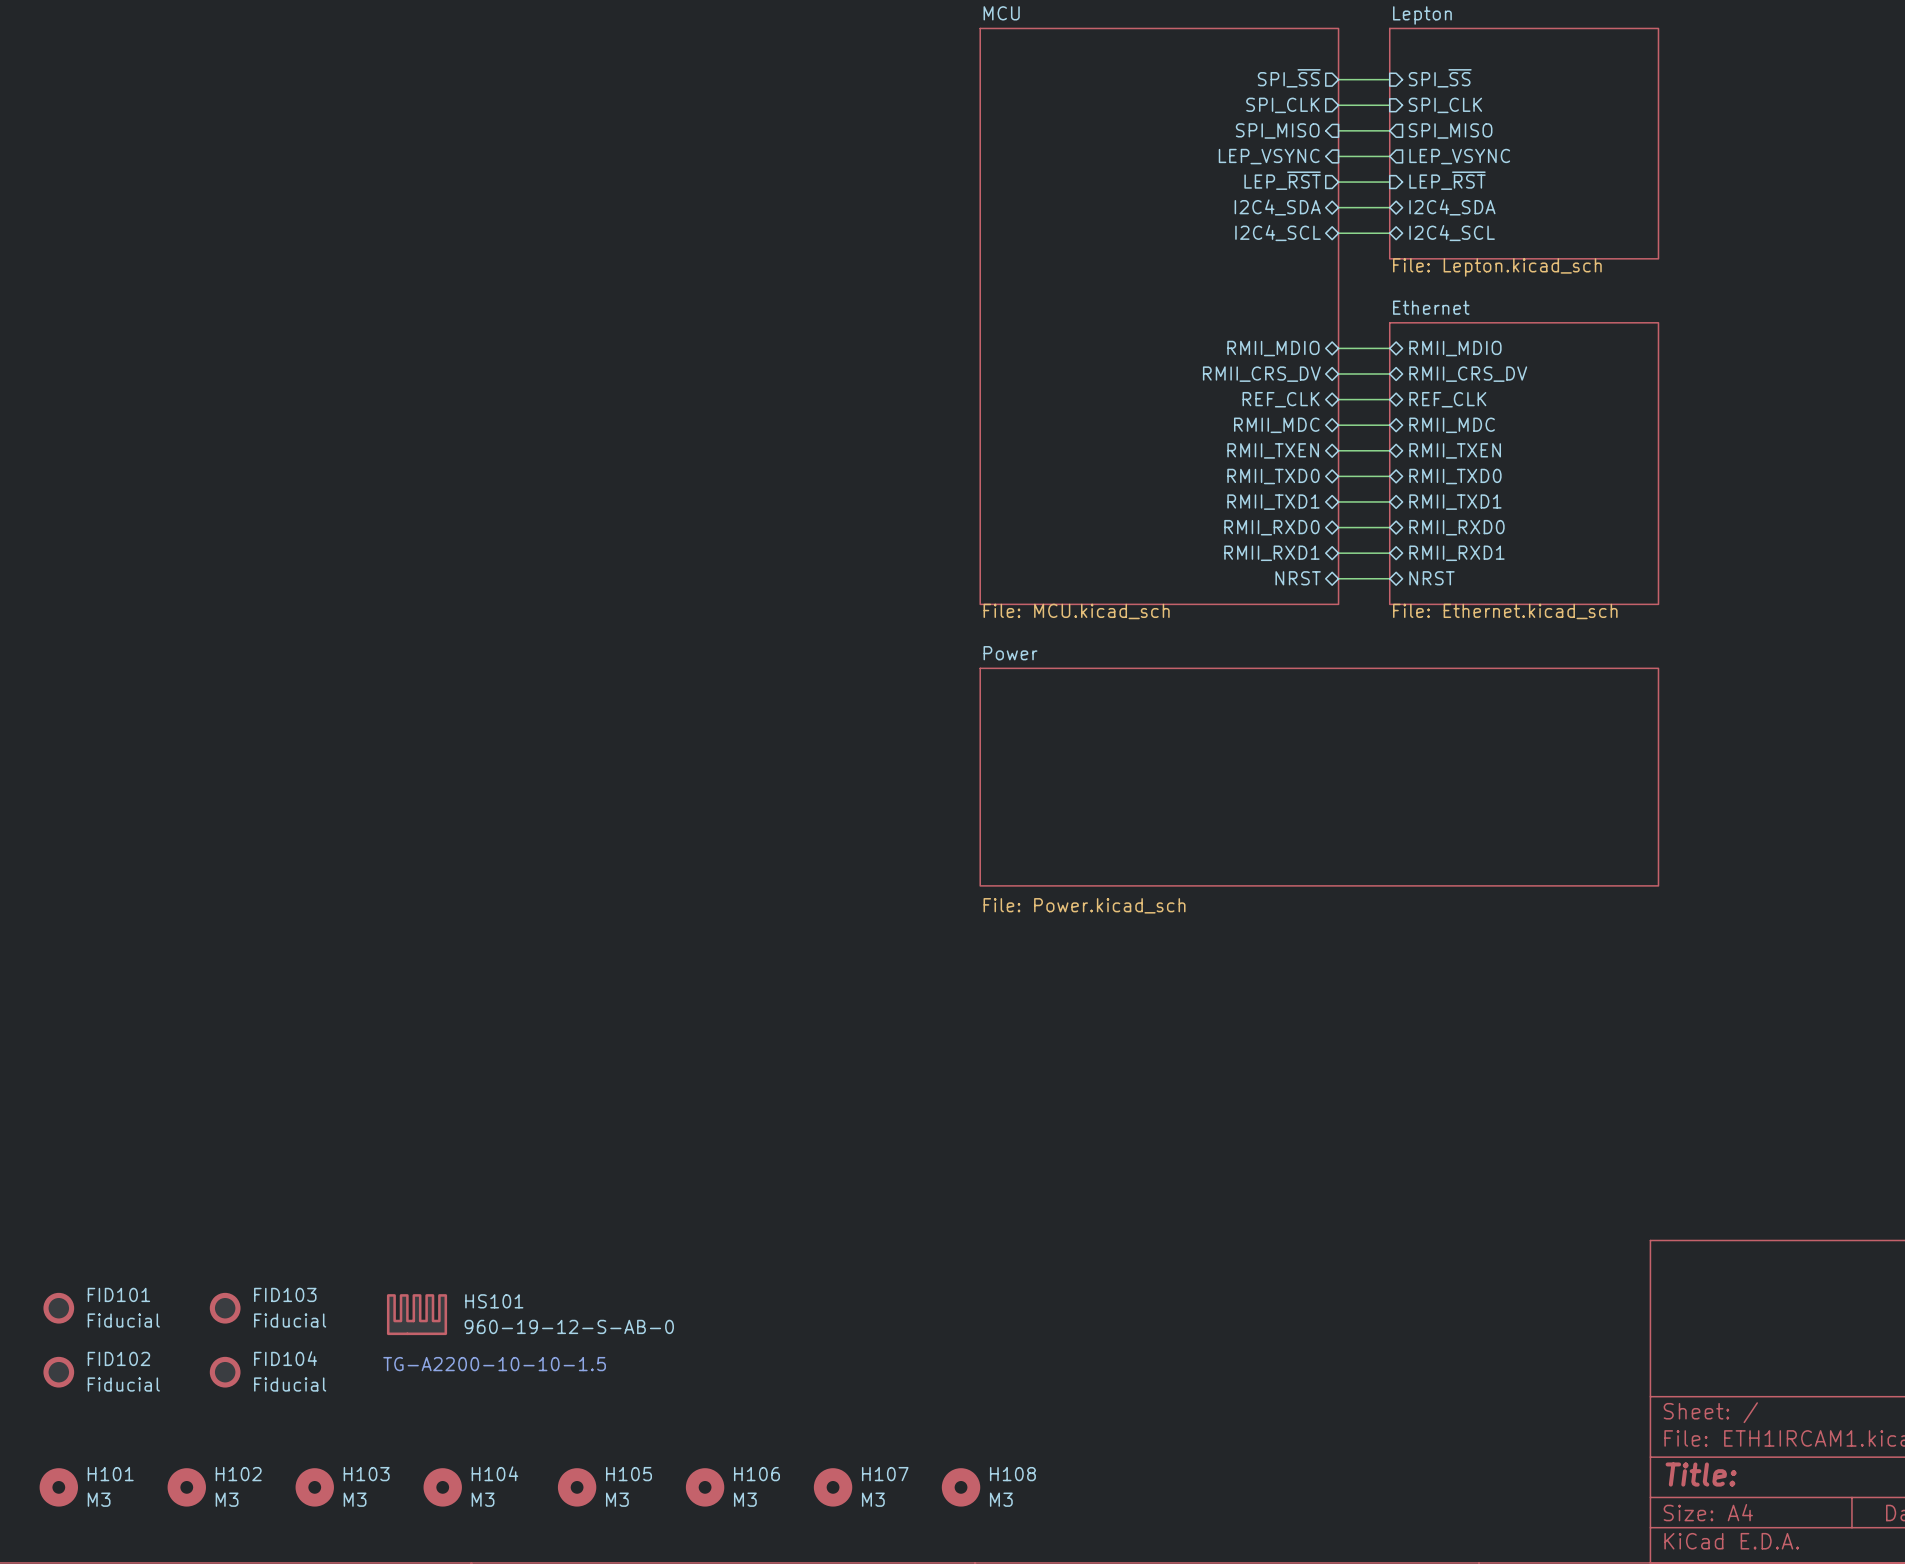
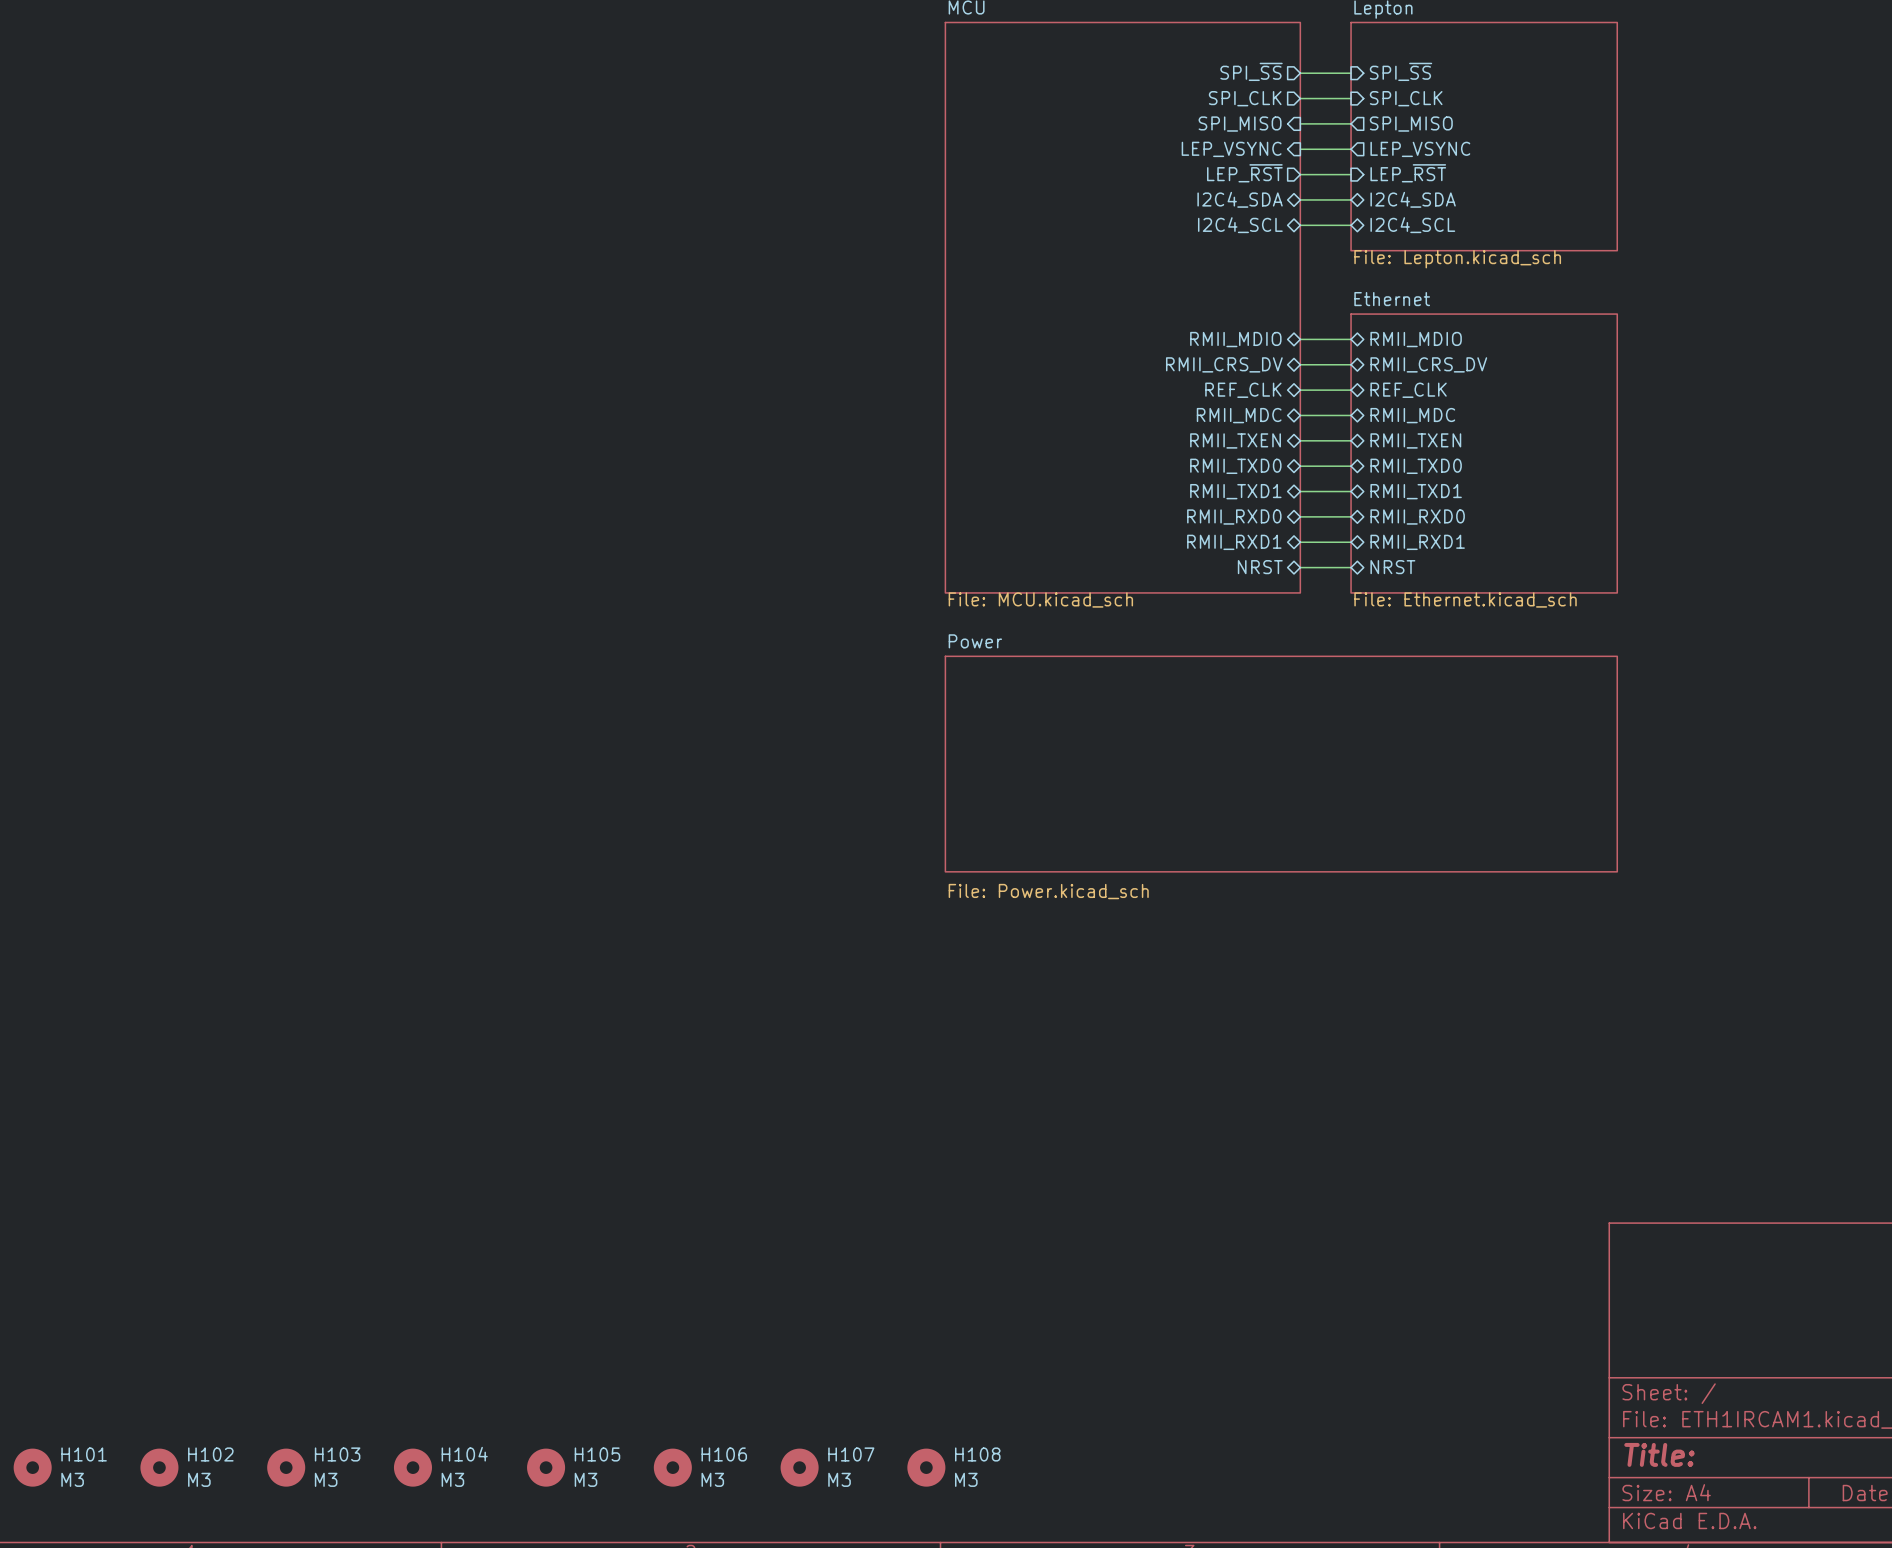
FID101: Fiducial (58, 1308) -> none
FID103: Fiducial (225, 1308) -> none
HS101: 960-19-12-S-AB-0 (417, 1314) -> none
text: TG-A2200-10-10-1.5 (494, 1364) -> none
FID102: Fiducial (58, 1372) -> none
FID104: Fiducial (225, 1372) -> none

